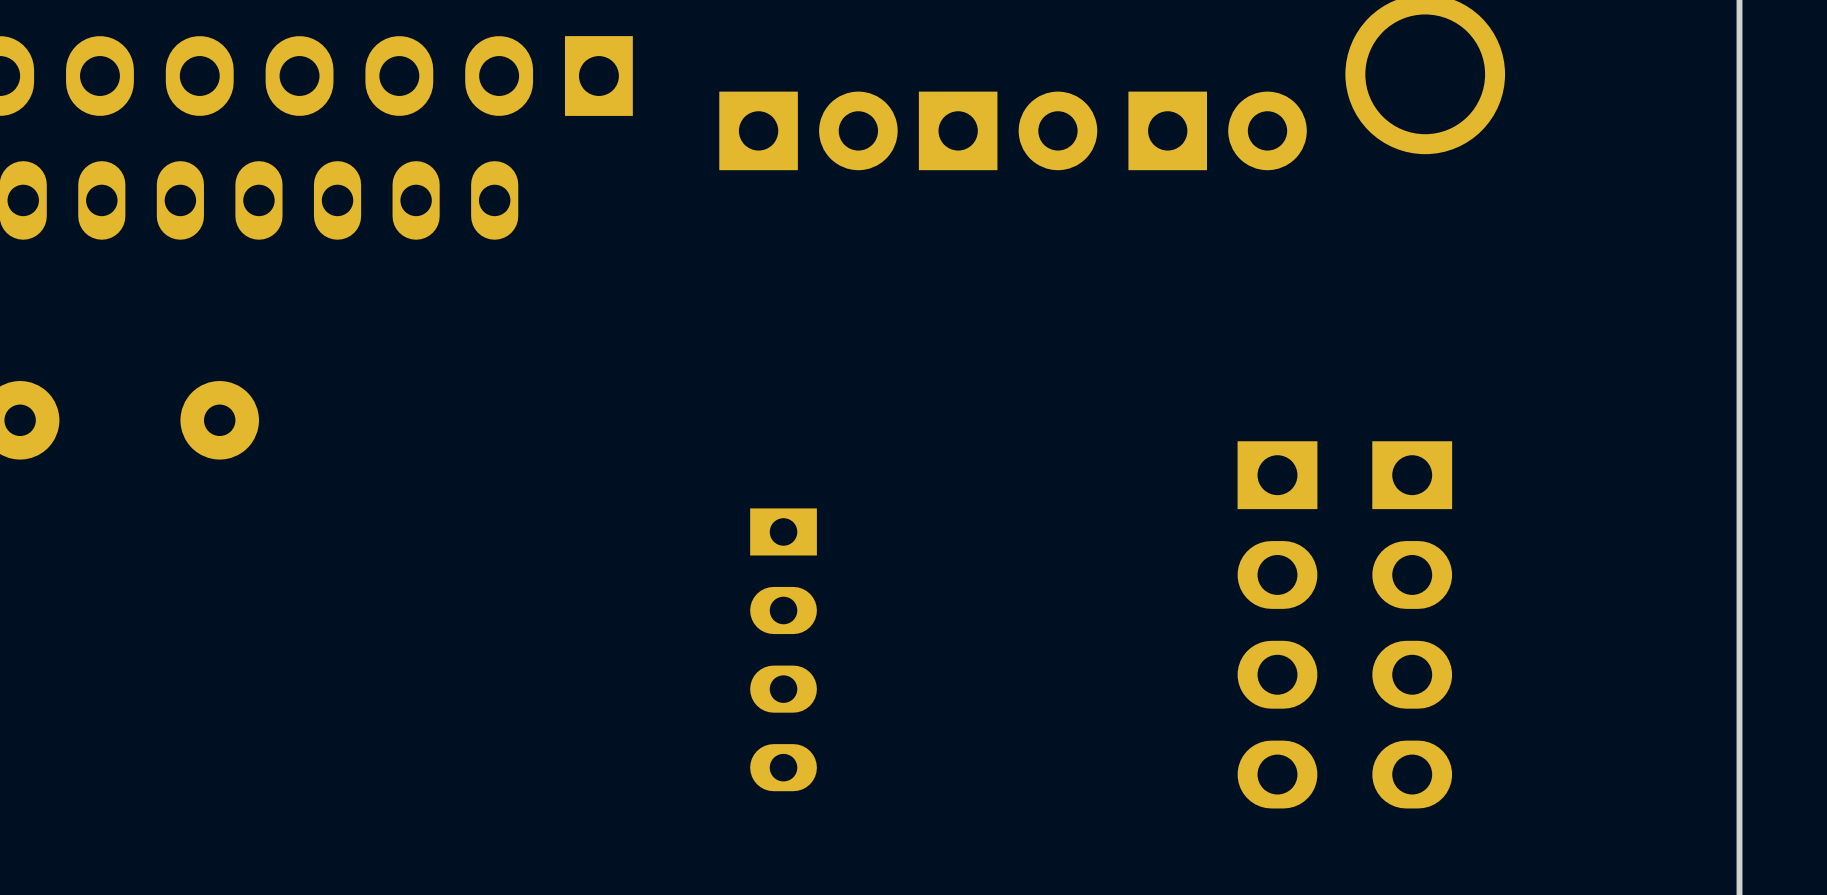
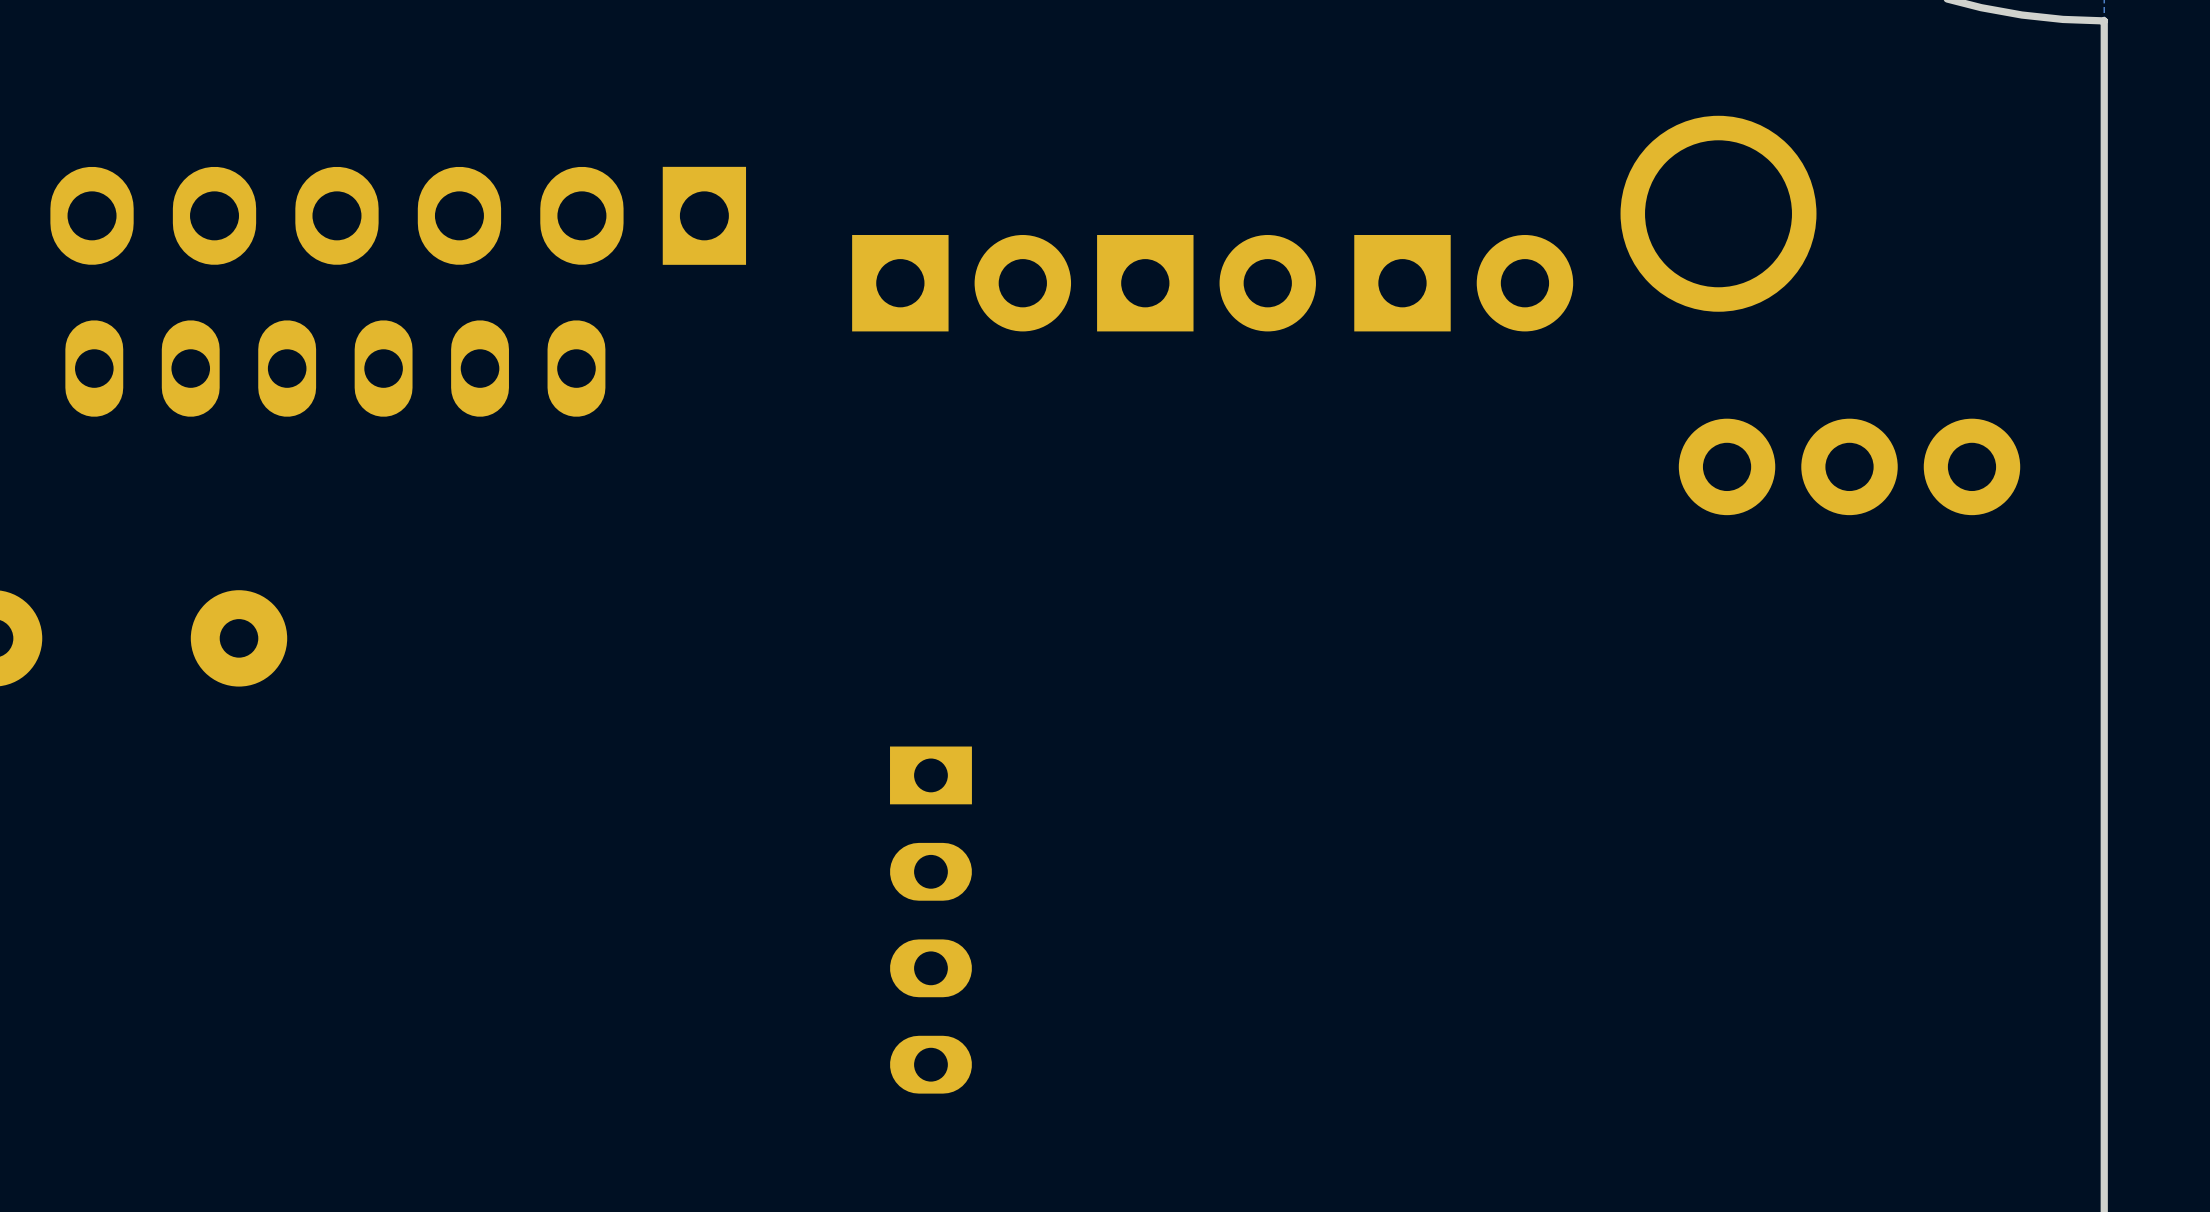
part: none -> (1849, 466)
part: (1277, 624) -> none
part: (1412, 624) -> none

